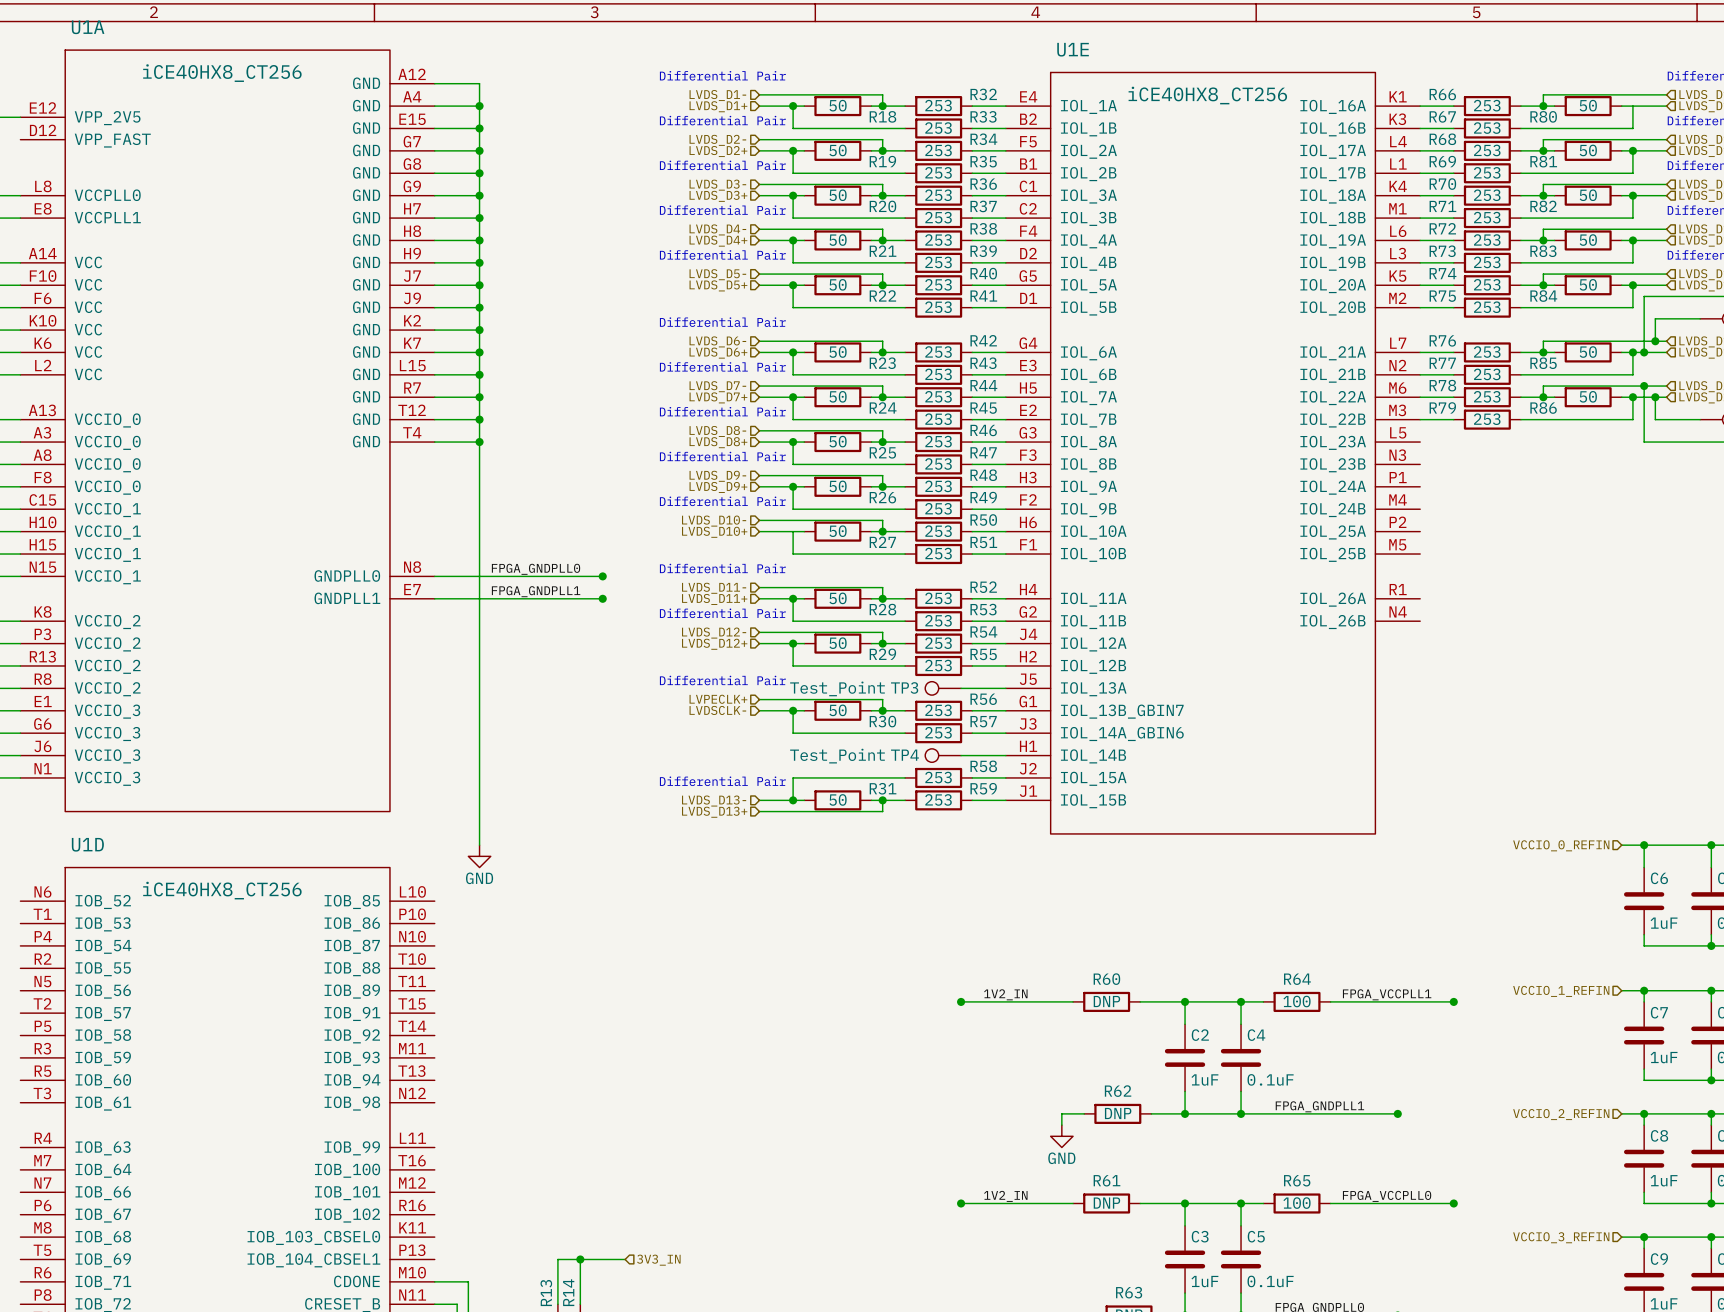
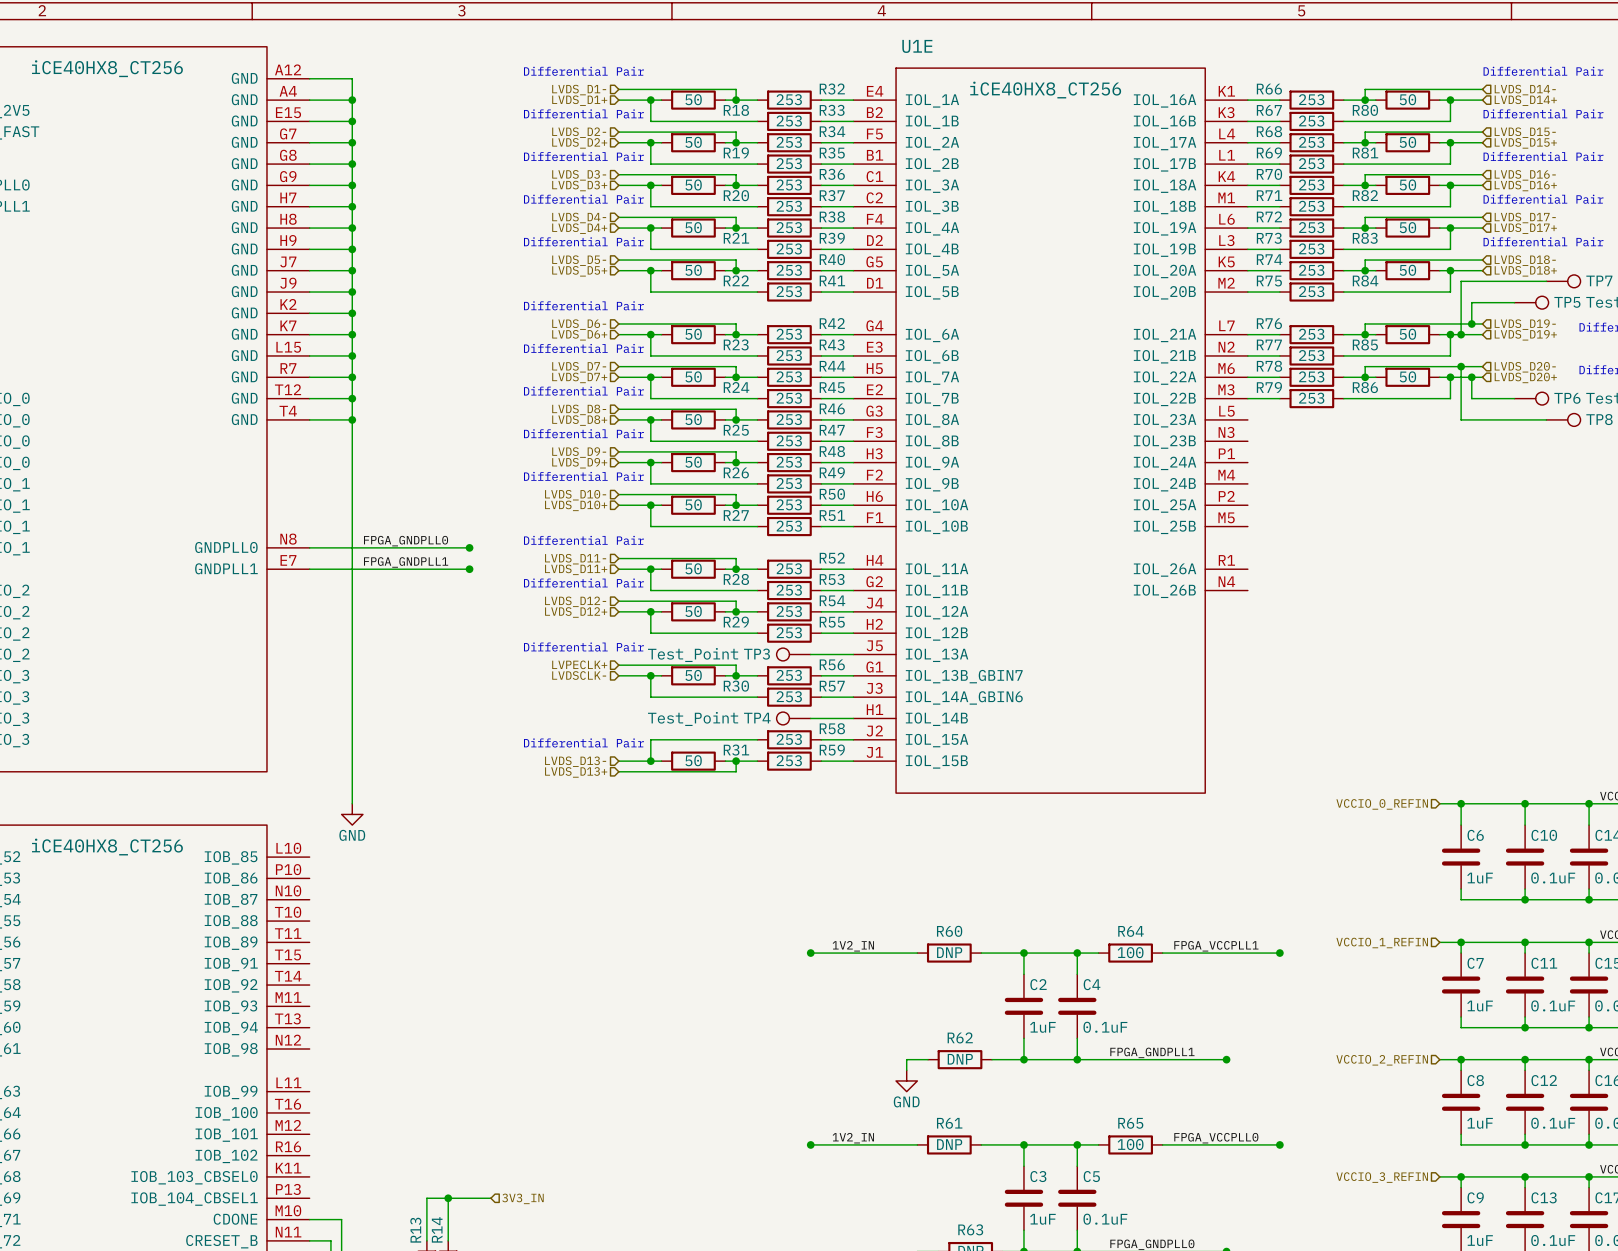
junction: none -> (1450, 100)
junction: none -> (650, 505)

